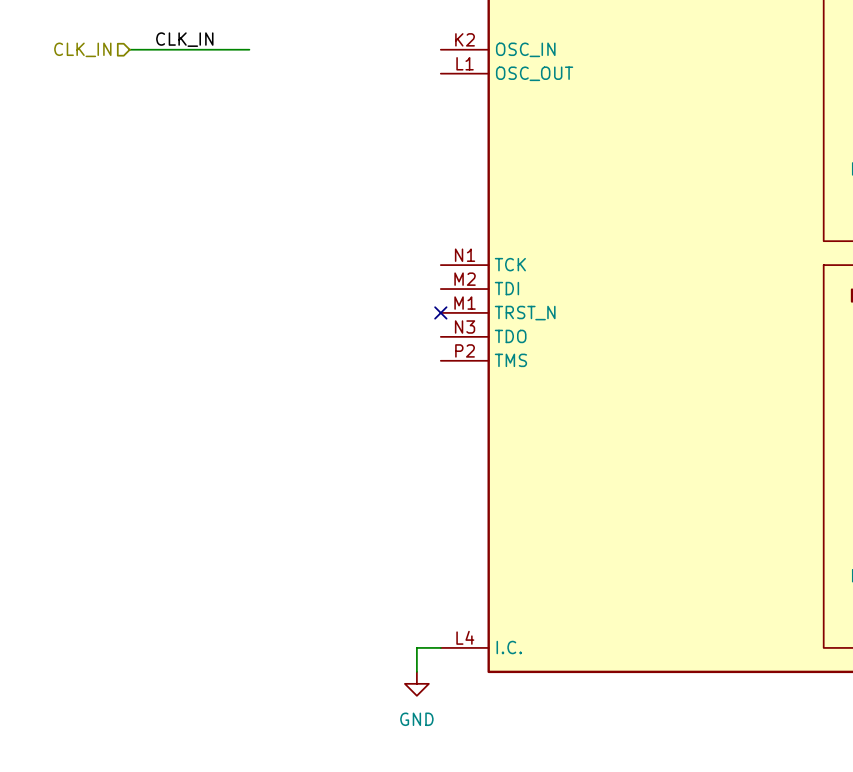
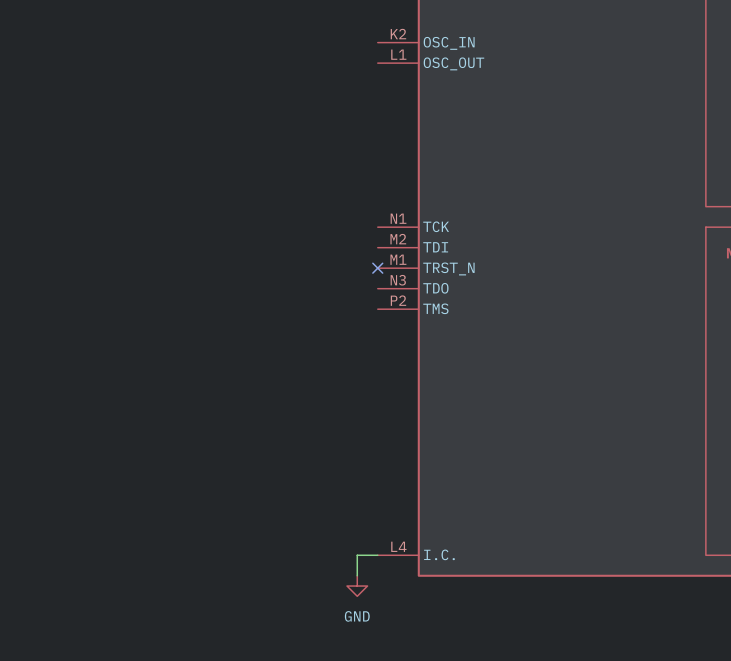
label: CLK_IN (184, 39) -> none
hierarchical label: CLK_IN (82, 49) -> none
wire: (129, 49) (249, 49) -> none

